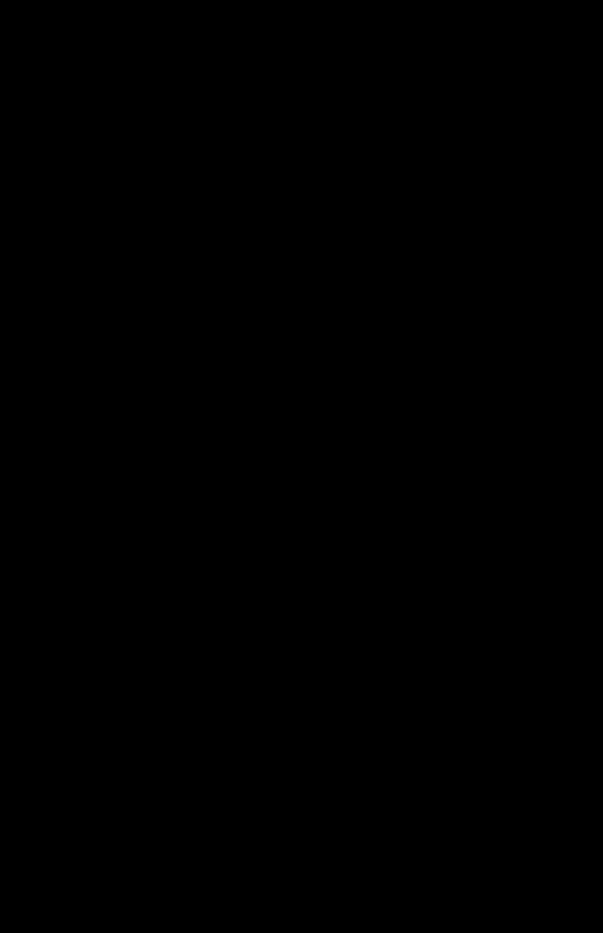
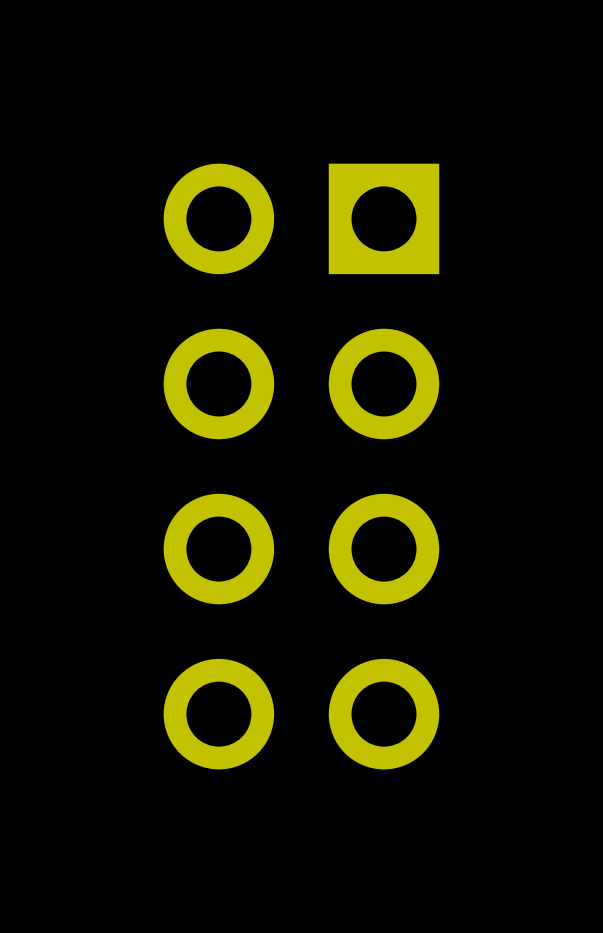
part: none -> (301, 466)

